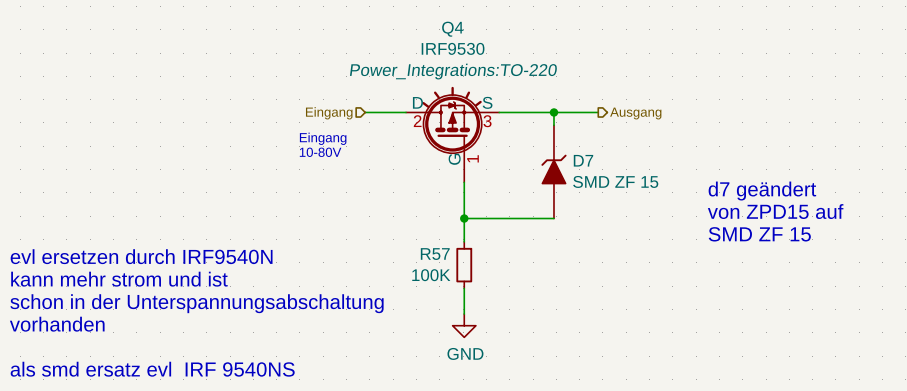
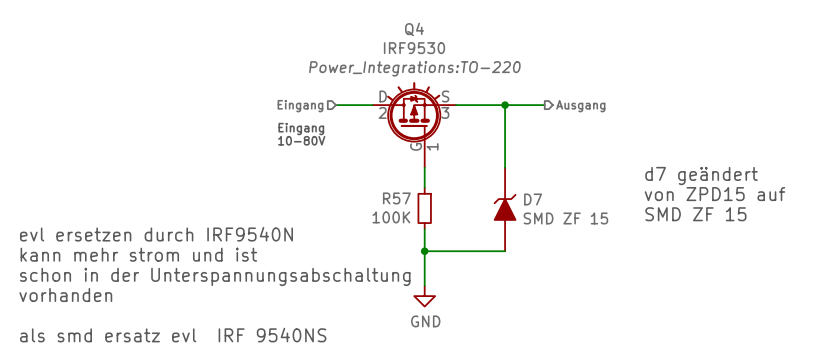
D7 position: (553, 171) -> (505, 209)
wire: (464, 204) (464, 241) -> (424, 229) (424, 262)
wire: (464, 218) (553, 218) -> (424, 251) (505, 251)
junction: (464, 218) -> none
R57 position: (464, 265) -> (424, 208)
junction: none -> (424, 251)

